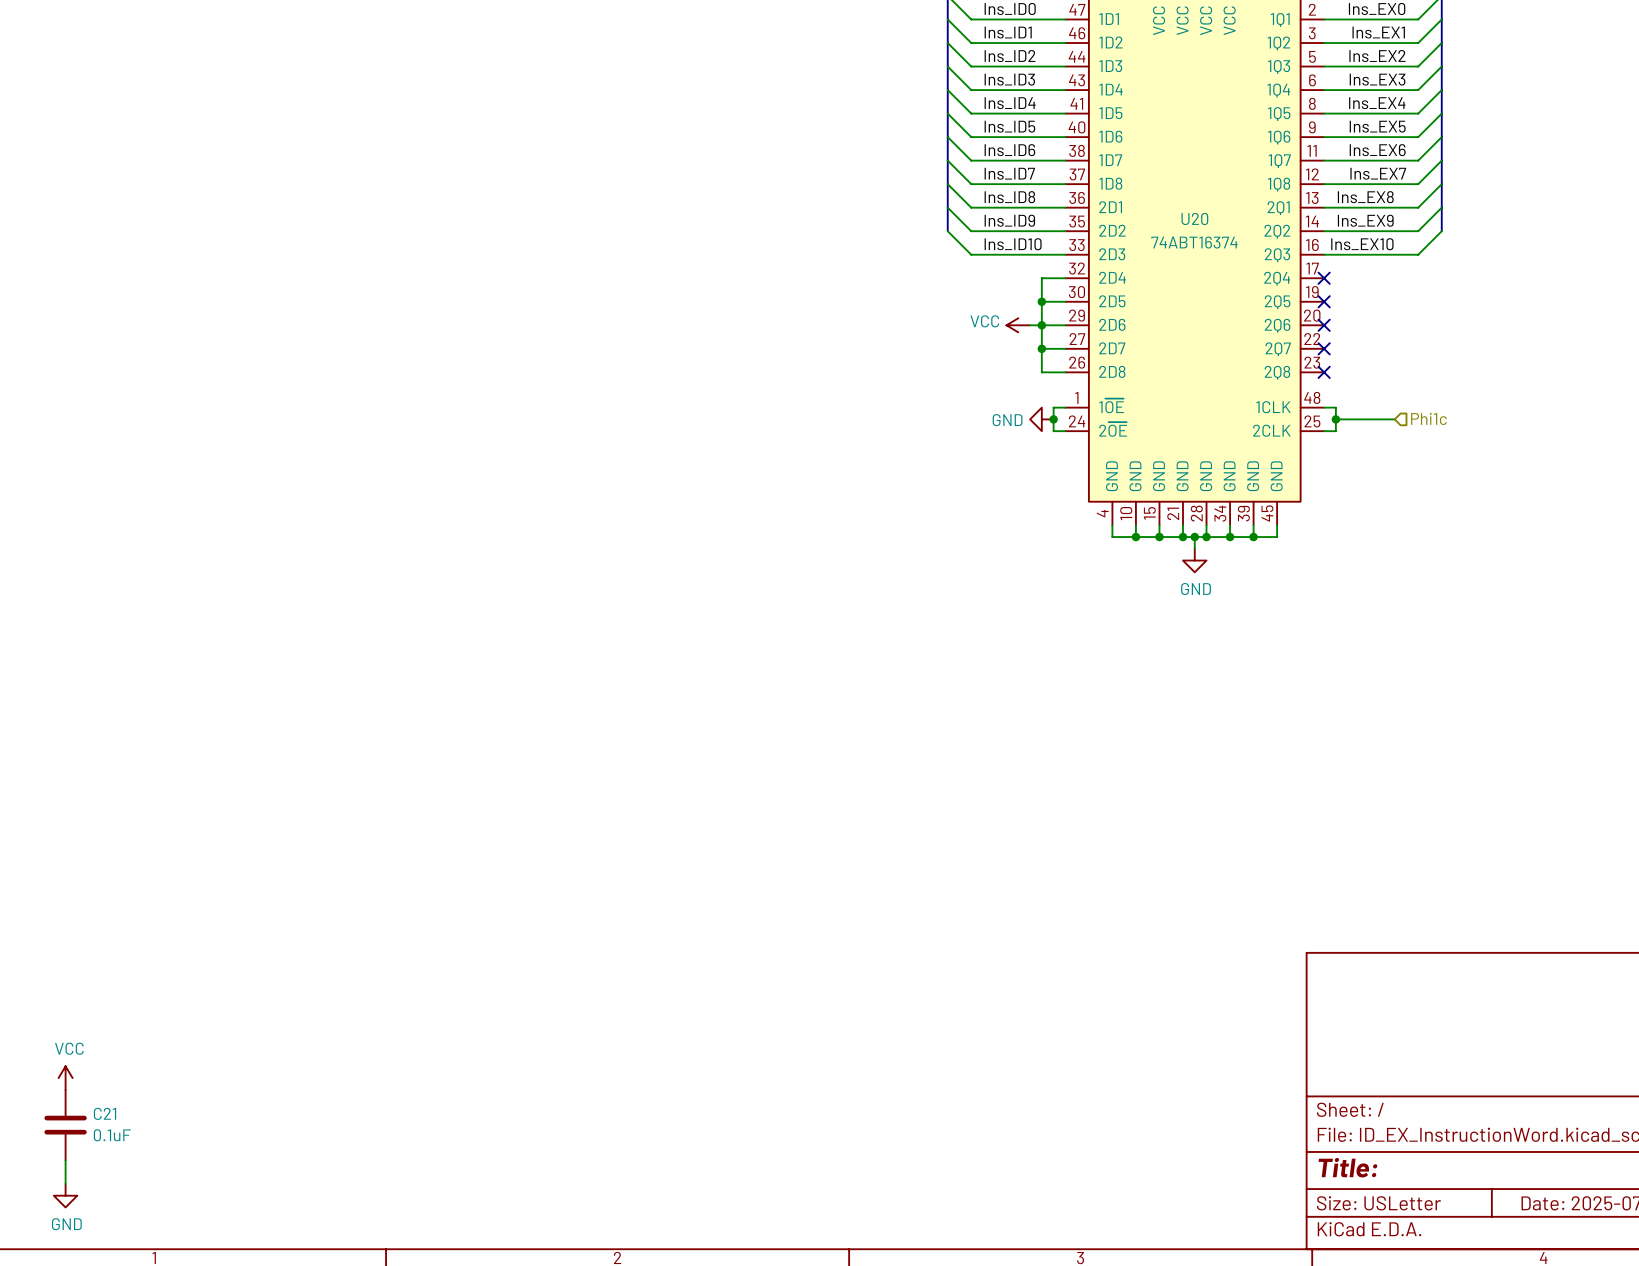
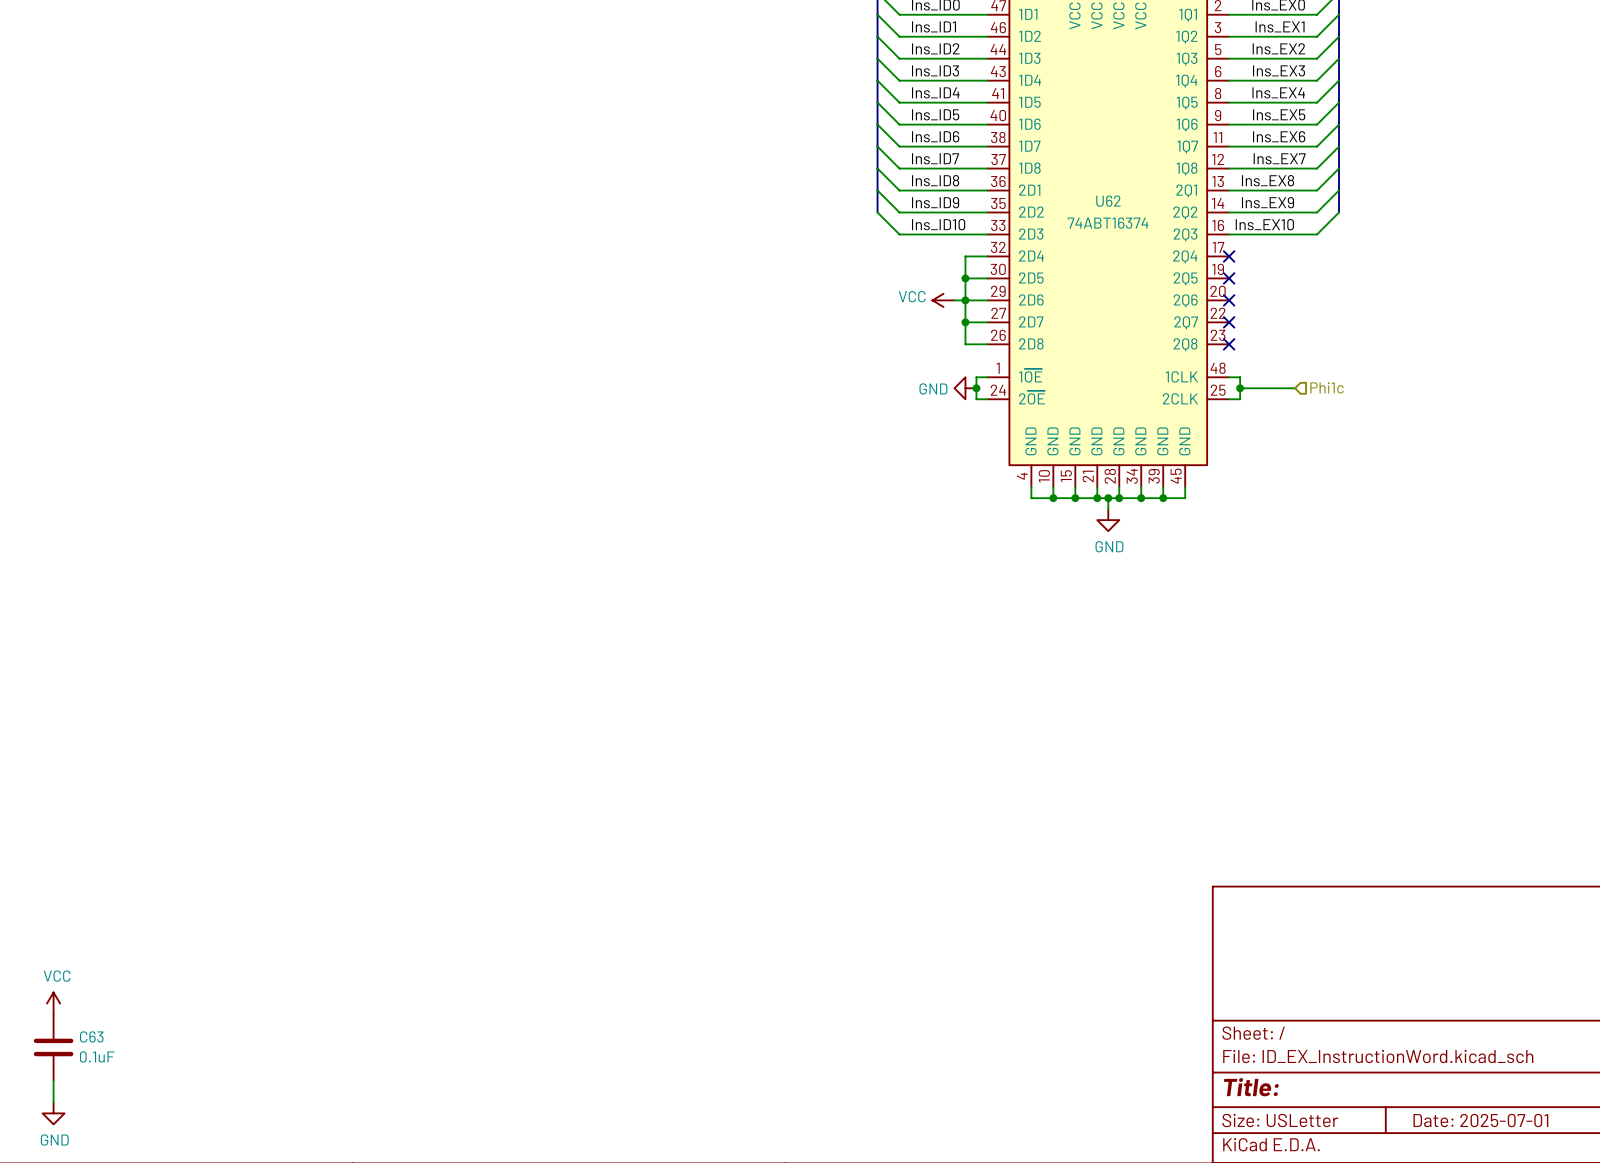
U20 name: U20 (1194, 219) -> U62 (1108, 201)
C21 name: C21 (105, 1113) -> C63 (91, 1036)

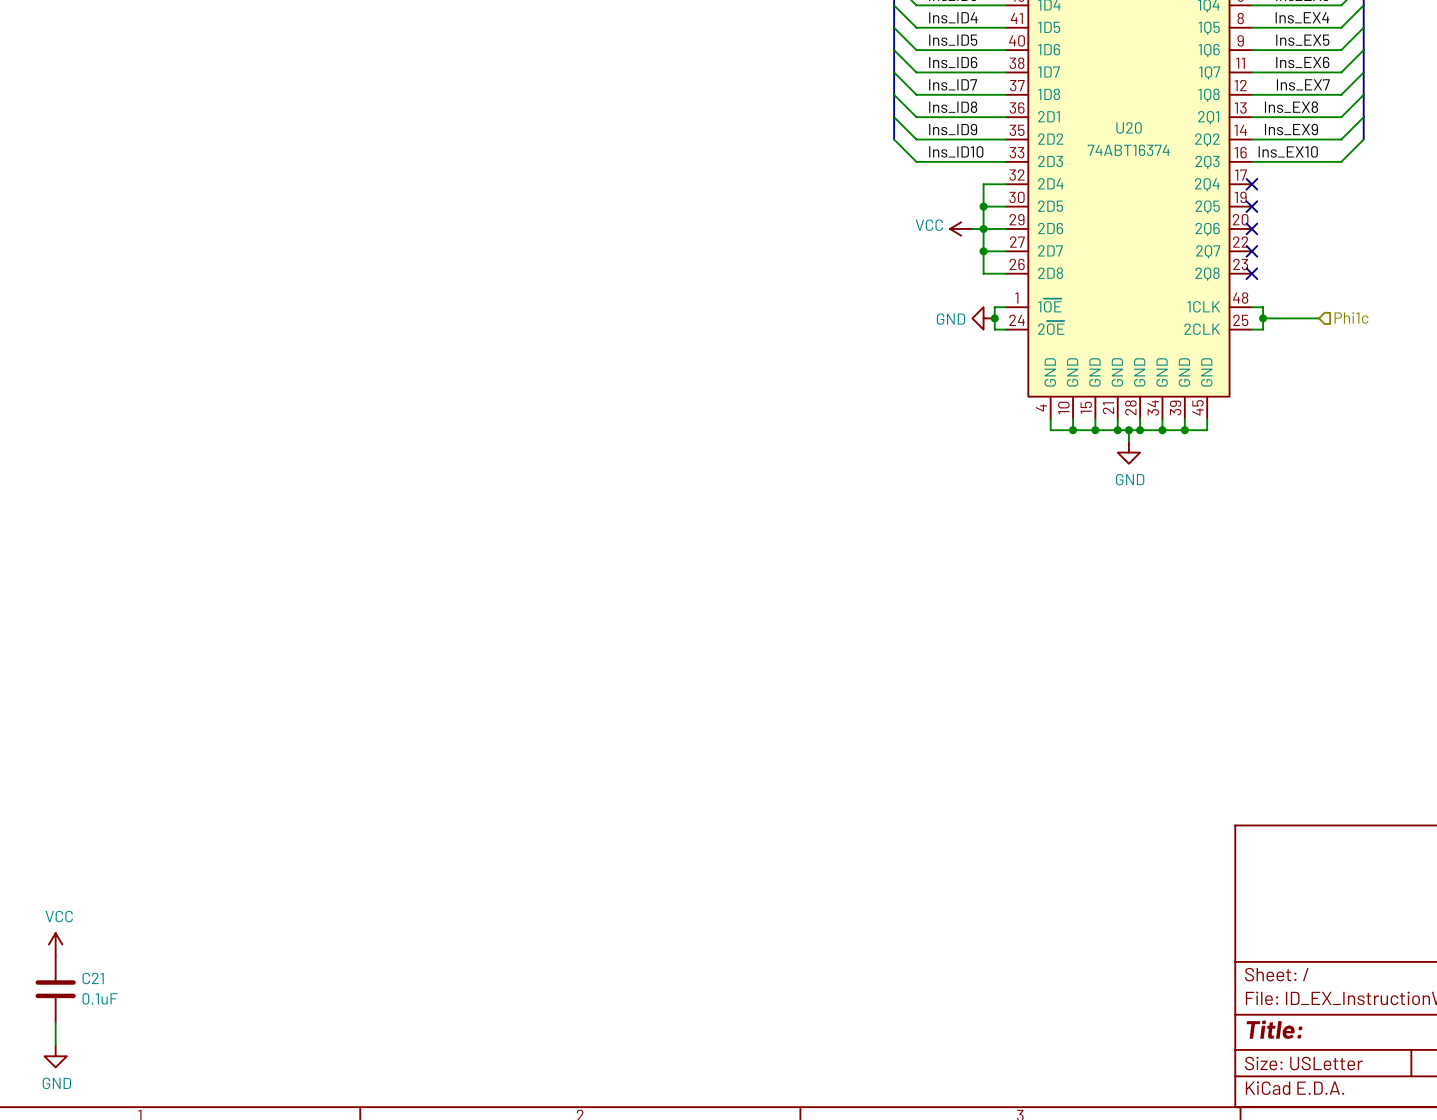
U62 name: U62 (1108, 201) -> U20 (1129, 127)
C63 name: C63 (91, 1036) -> C21 (93, 978)

